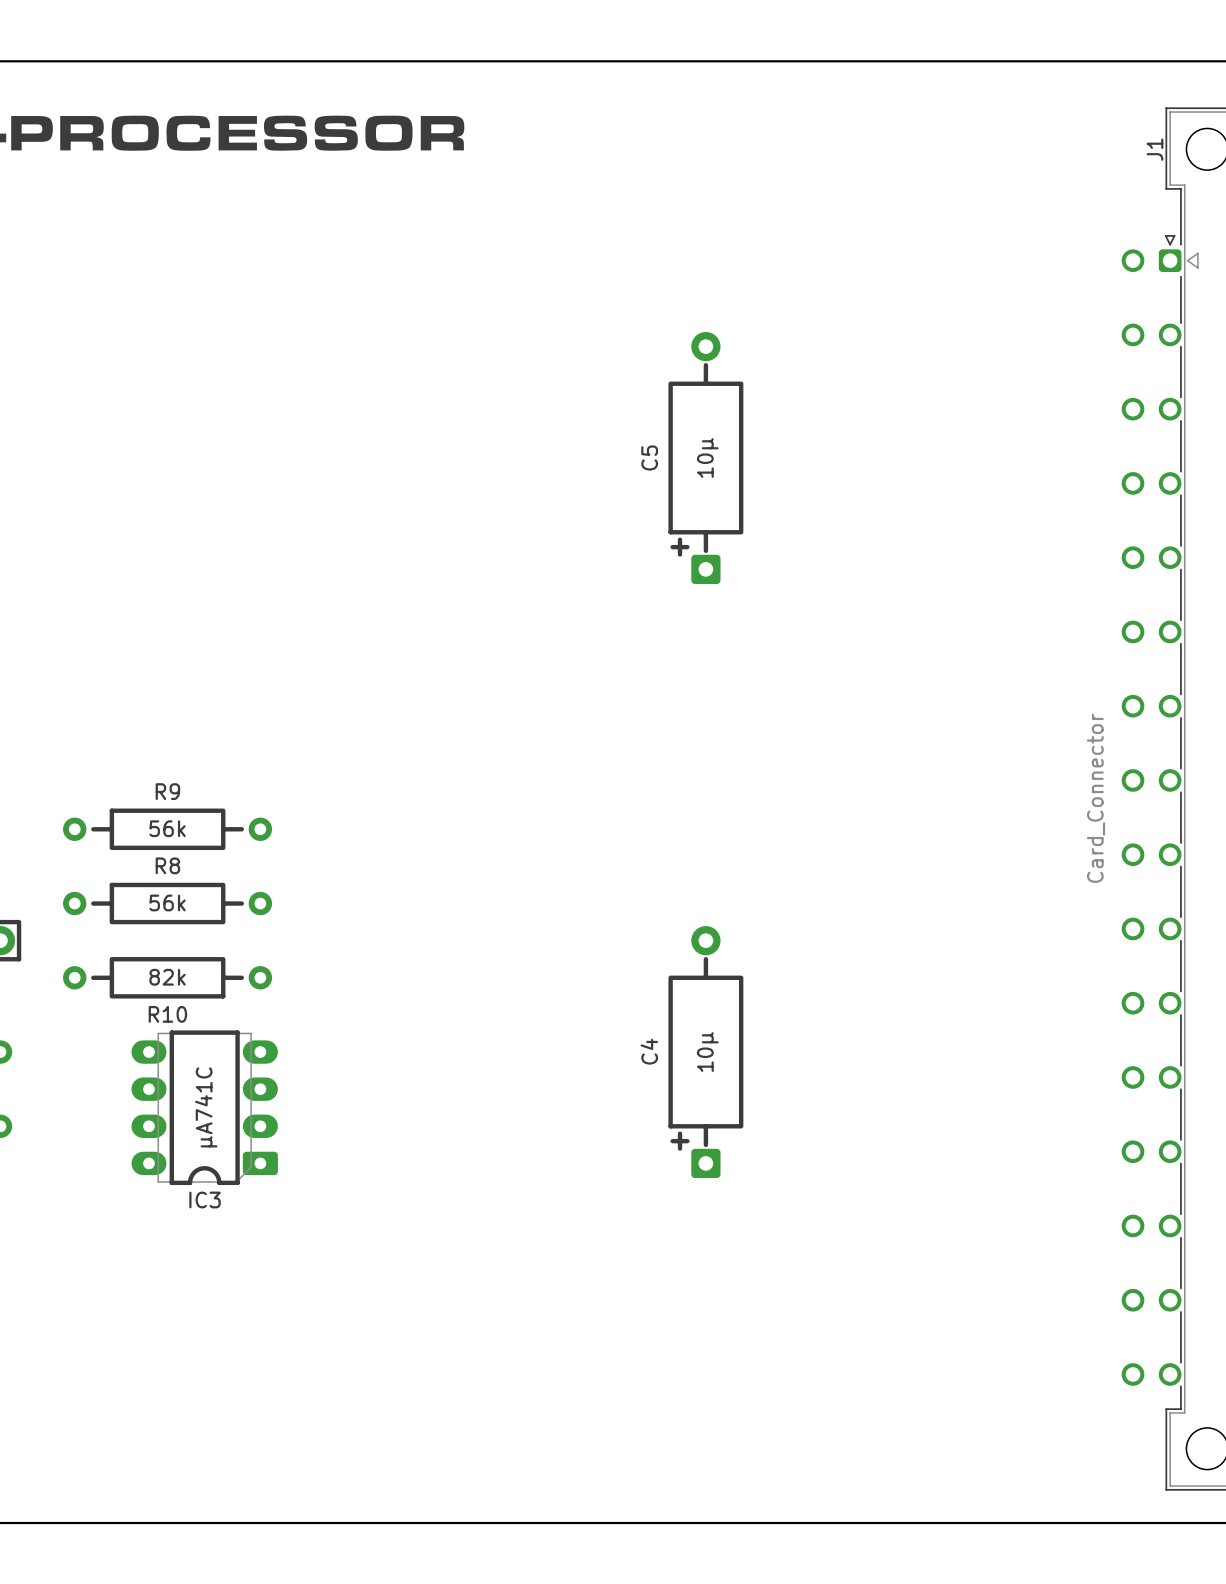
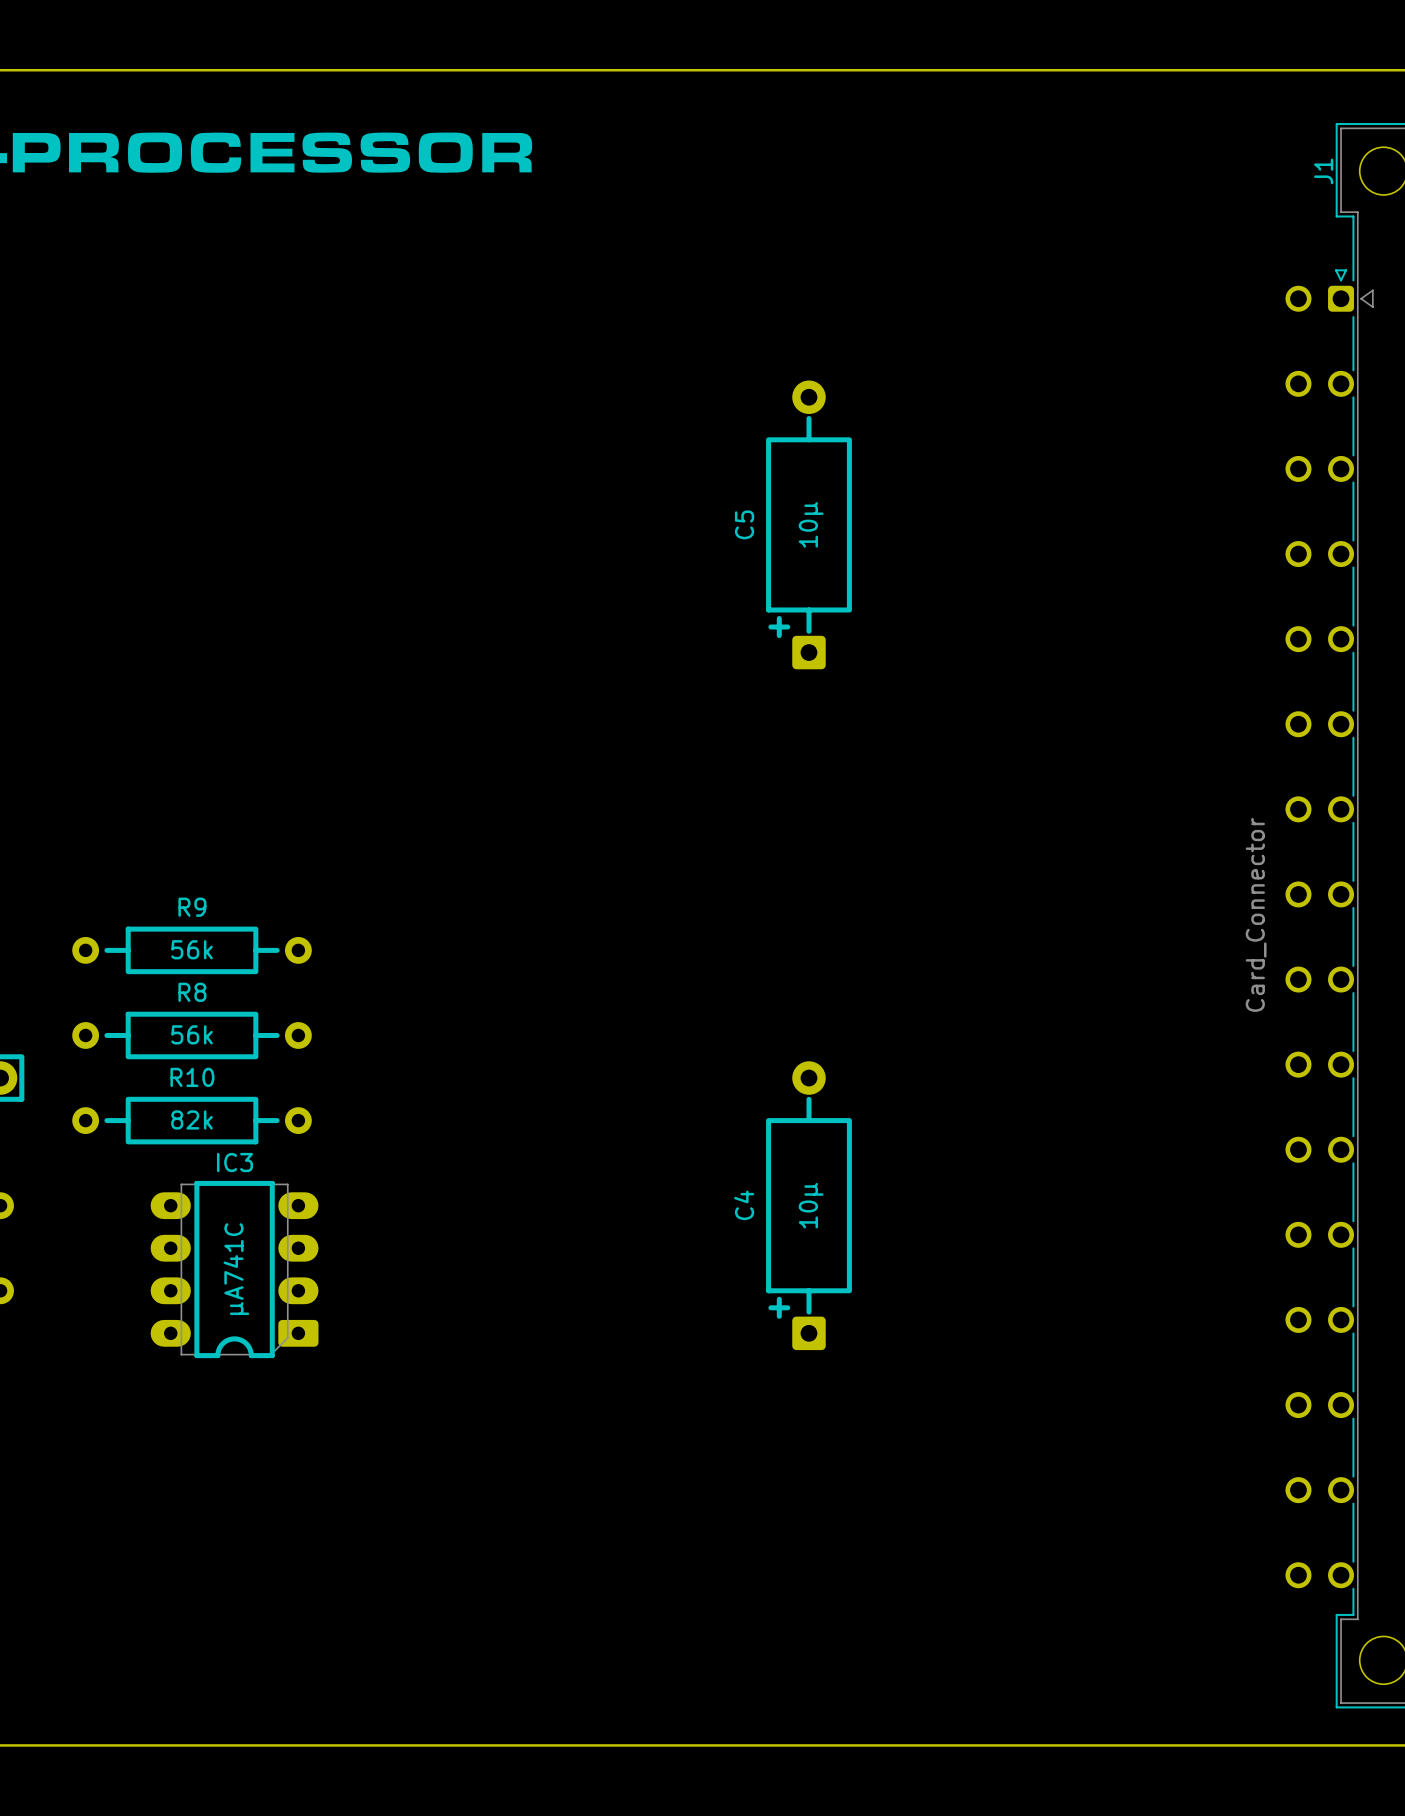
R10 name position: R10 (167, 1014) -> R10 (192, 1077)
IC3 name position: IC3 (205, 1200) -> IC3 (234, 1162)

